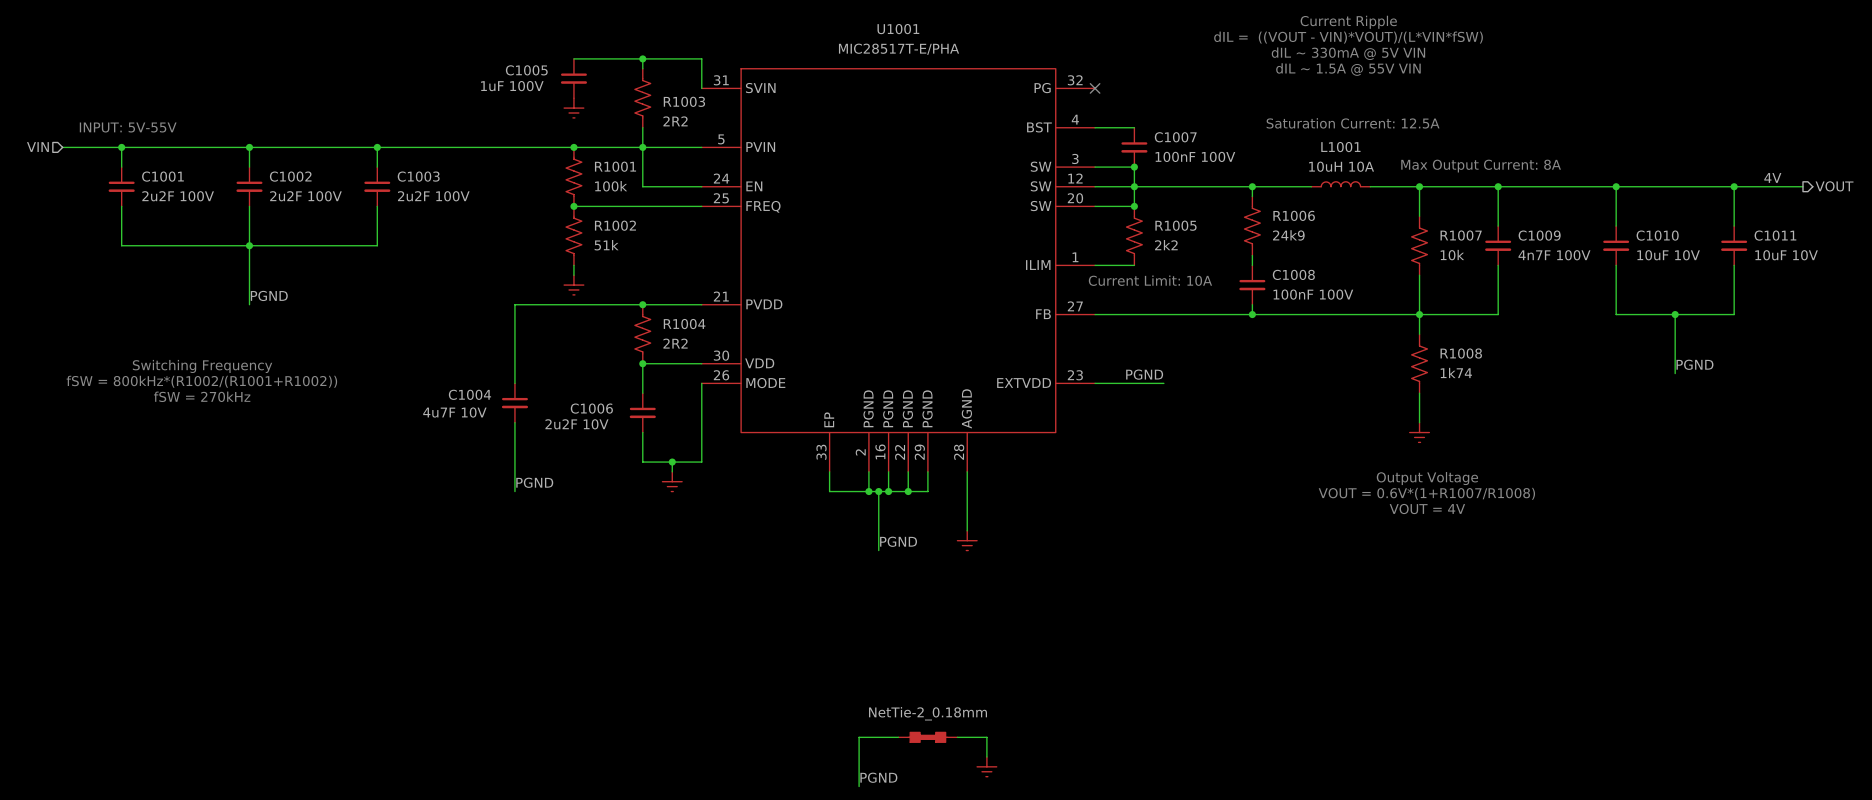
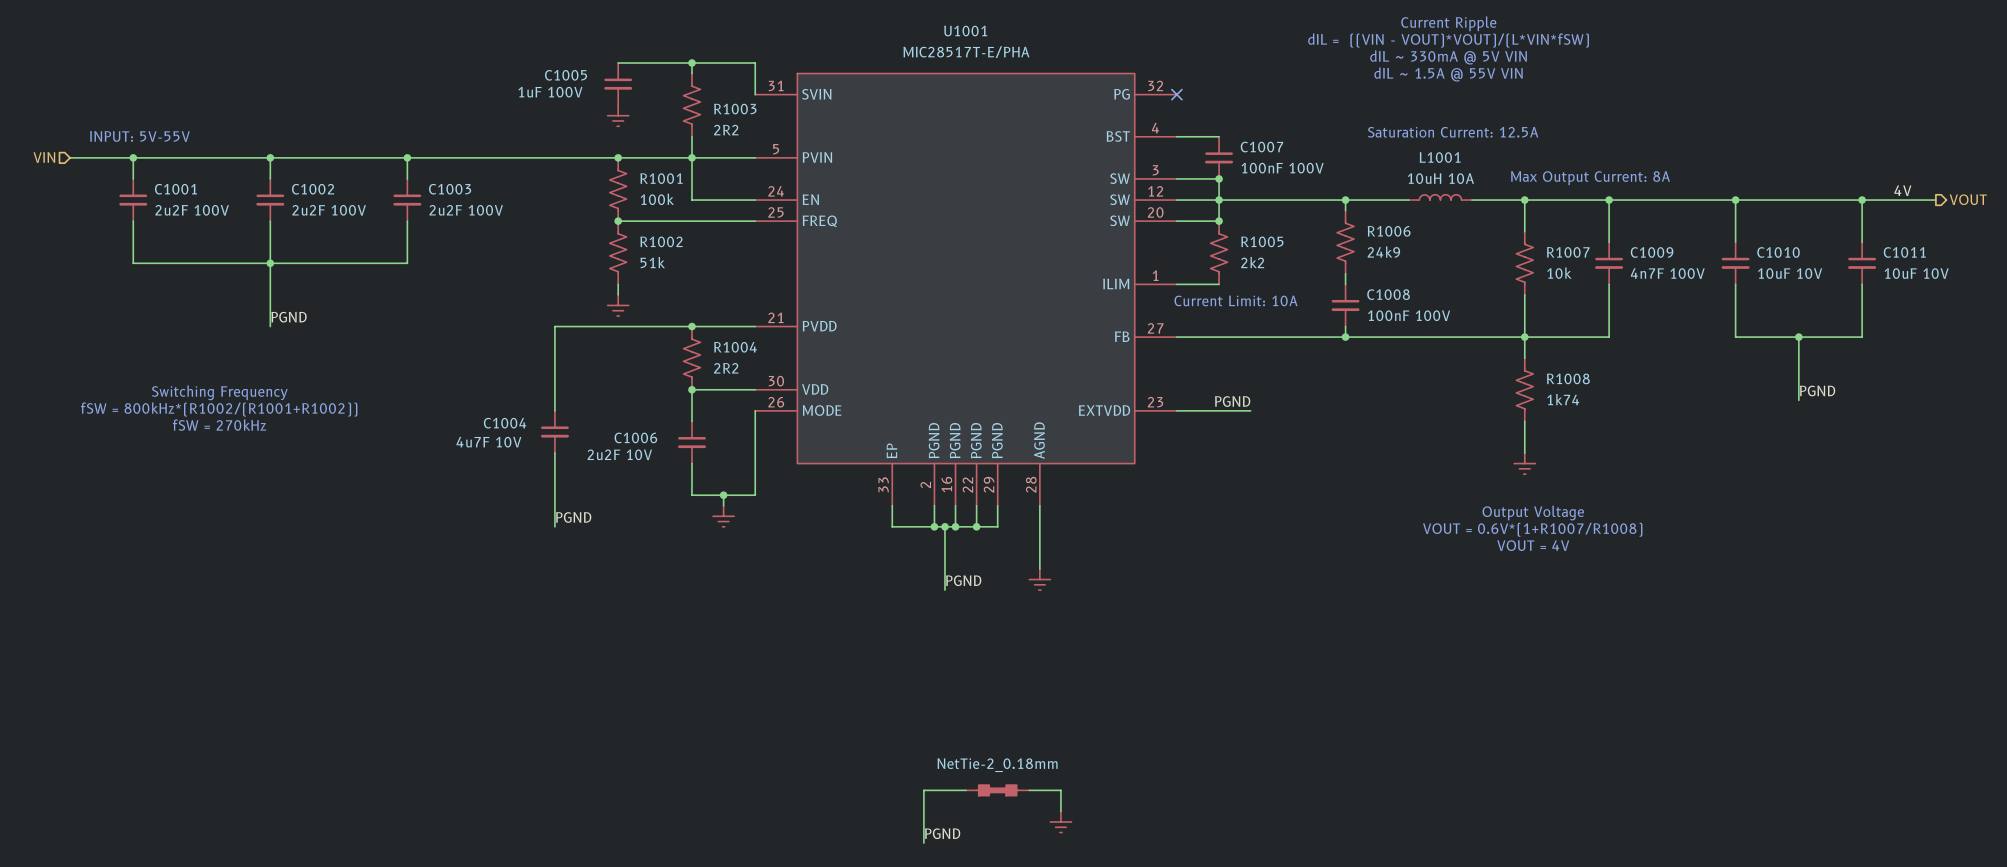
text: dIL = ((VOUT - VIN)*VOUT)/(L*VIN*fSW) (1348, 37) -> dIL = ((VIN - VOUT)*VOUT)/(L*VIN*fSW) (1448, 40)

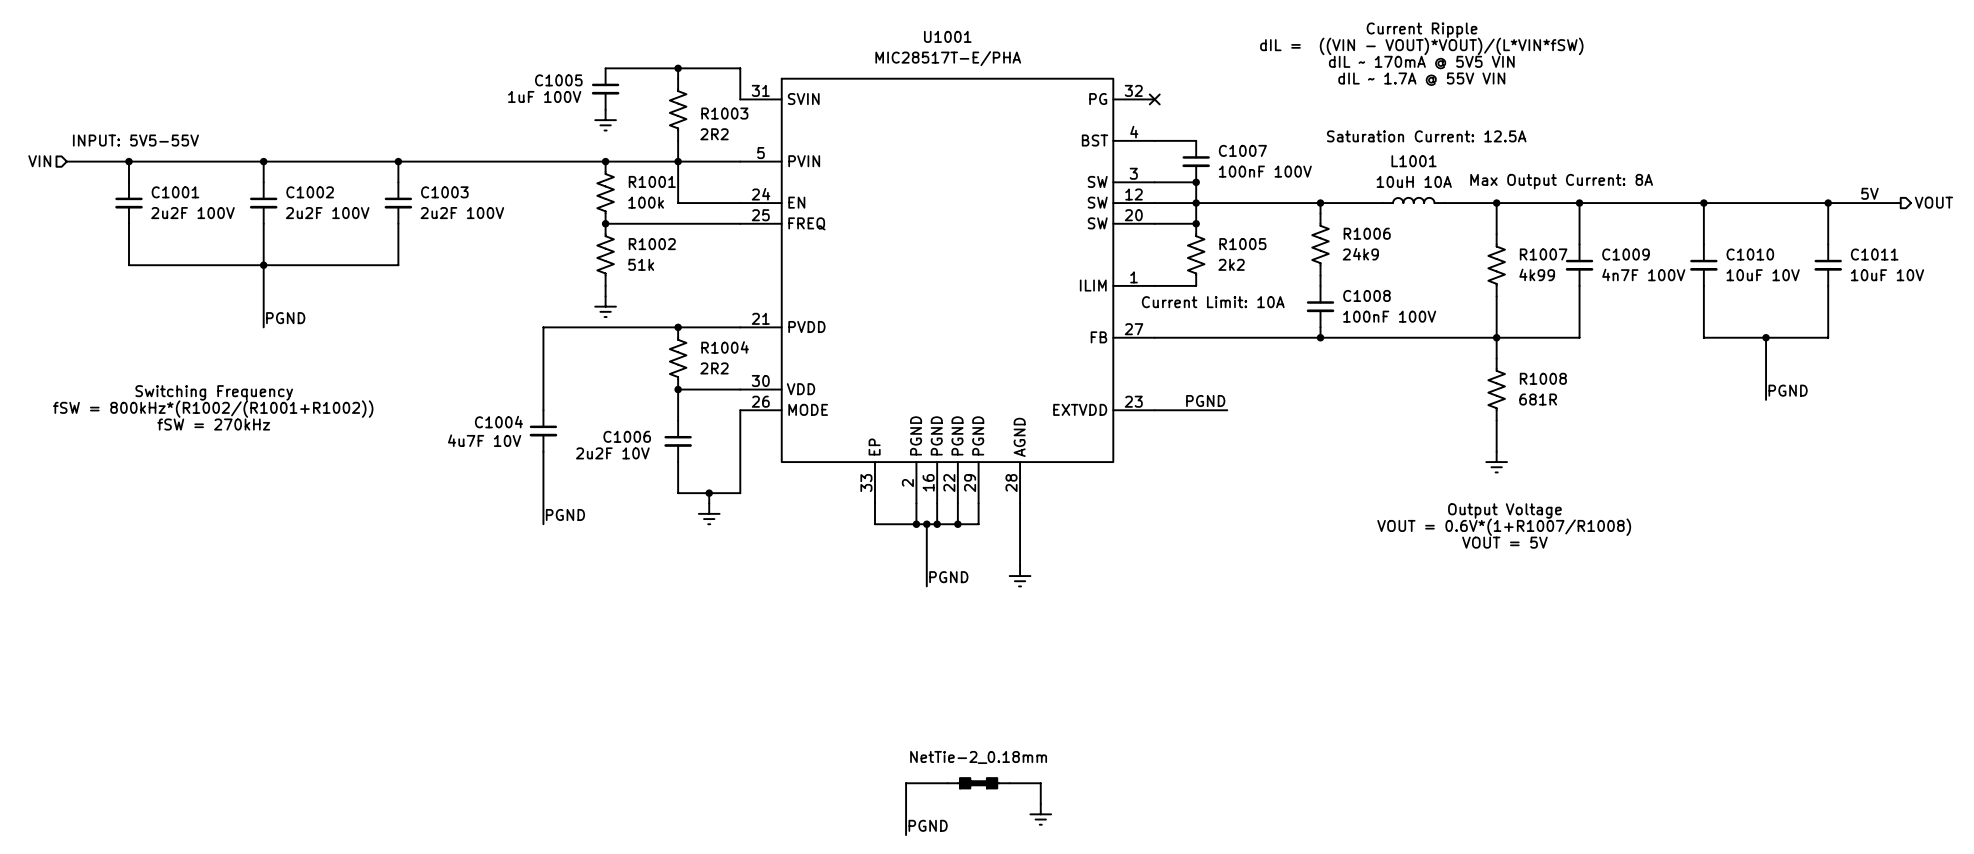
text: dIL ~ 330mA @ 5V VIN (1448, 57) -> dIL ~ 170mA @ 5V5 VIN (1421, 62)
text: dIL ~ 1.5A @ 55V VIN (1448, 74) -> dIL ~ 1.7A @ 55V VIN (1421, 79)
text: INPUT: 5V-55V (139, 136) -> INPUT: 5V5-55V (135, 140)
label: 4V (1902, 190) -> 5V (1869, 193)
R1007 value: 10k (1559, 273) -> 4k99 (1537, 274)
R1008 value: 1k74 (1563, 399) -> 681R (1538, 399)
text: VOUT = 4V (1533, 545) -> VOUT = 5V (1504, 542)

